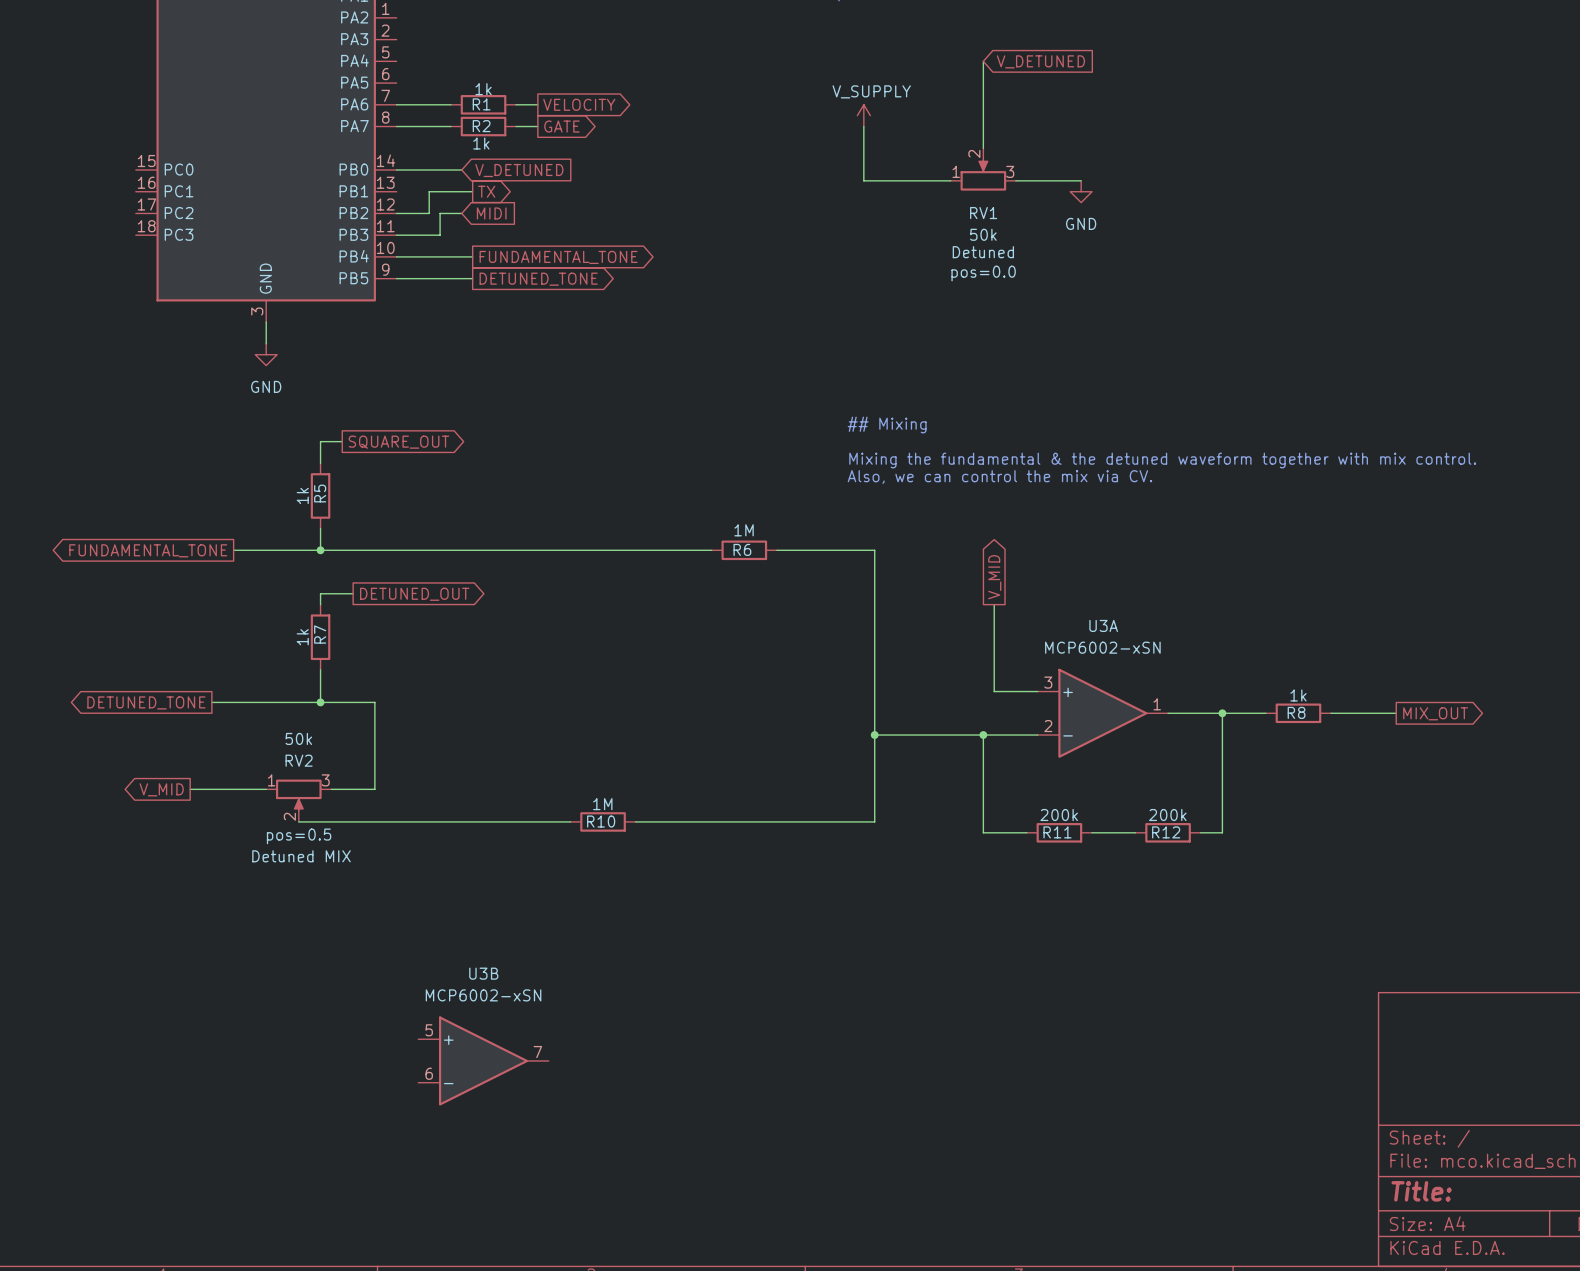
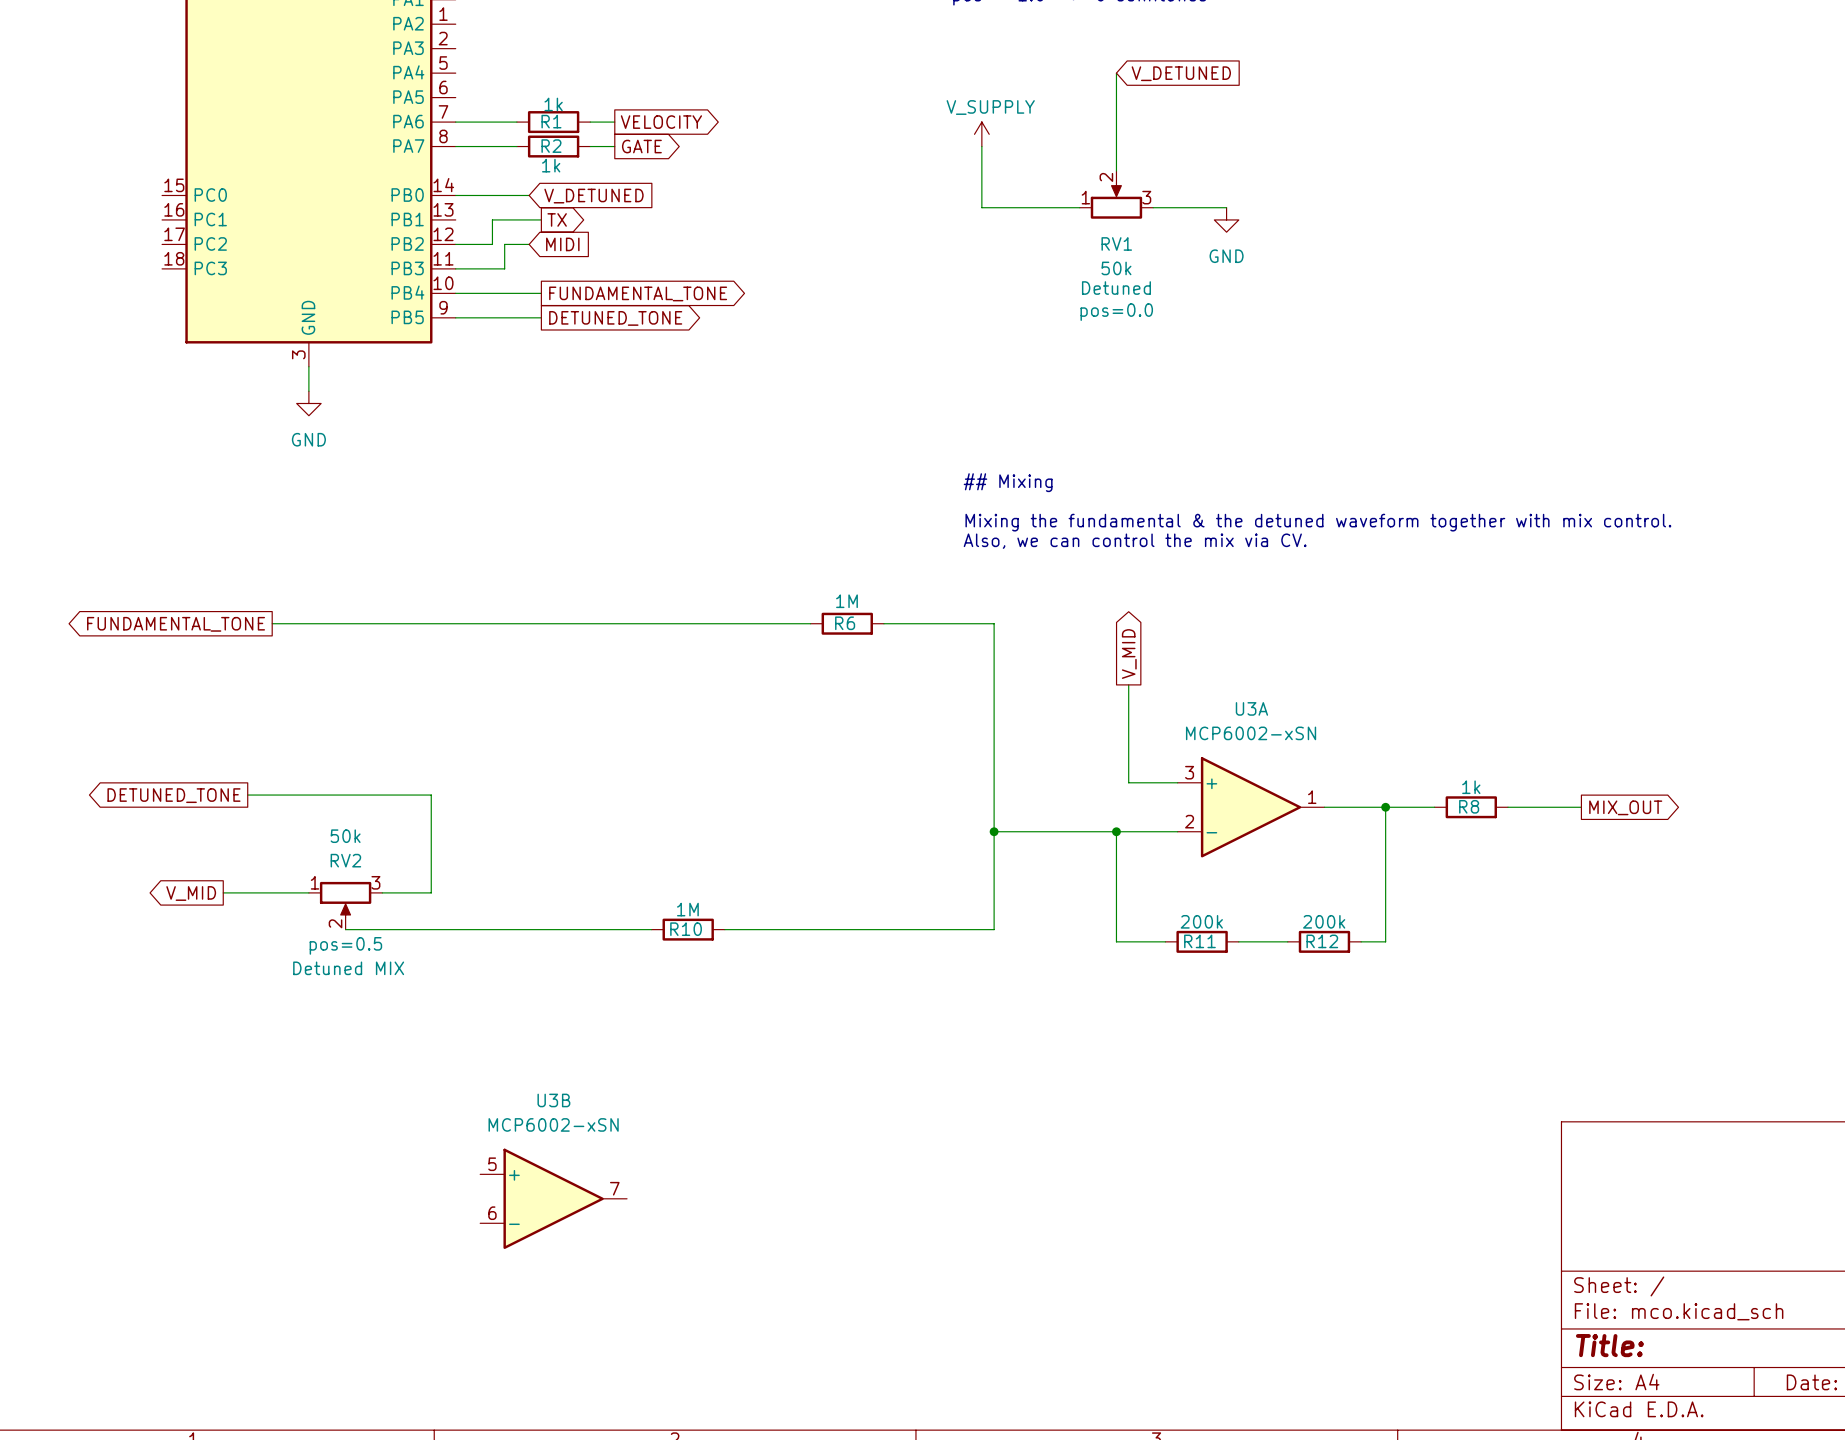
wire: (342, 441) (320, 441) (320, 463) -> none
global label: SQUARE_OUT (398, 442) -> none
R5: 1k (320, 495) -> none
wire: (320, 528) (320, 550) -> none
junction: (320, 550) -> none
wire: (353, 593) (320, 593) (320, 604) -> none
global label: DETUNED_OUT (414, 594) -> none
R7: 1k (320, 637) -> none
wire: (320, 669) (320, 702) -> none
junction: (320, 702) -> none

